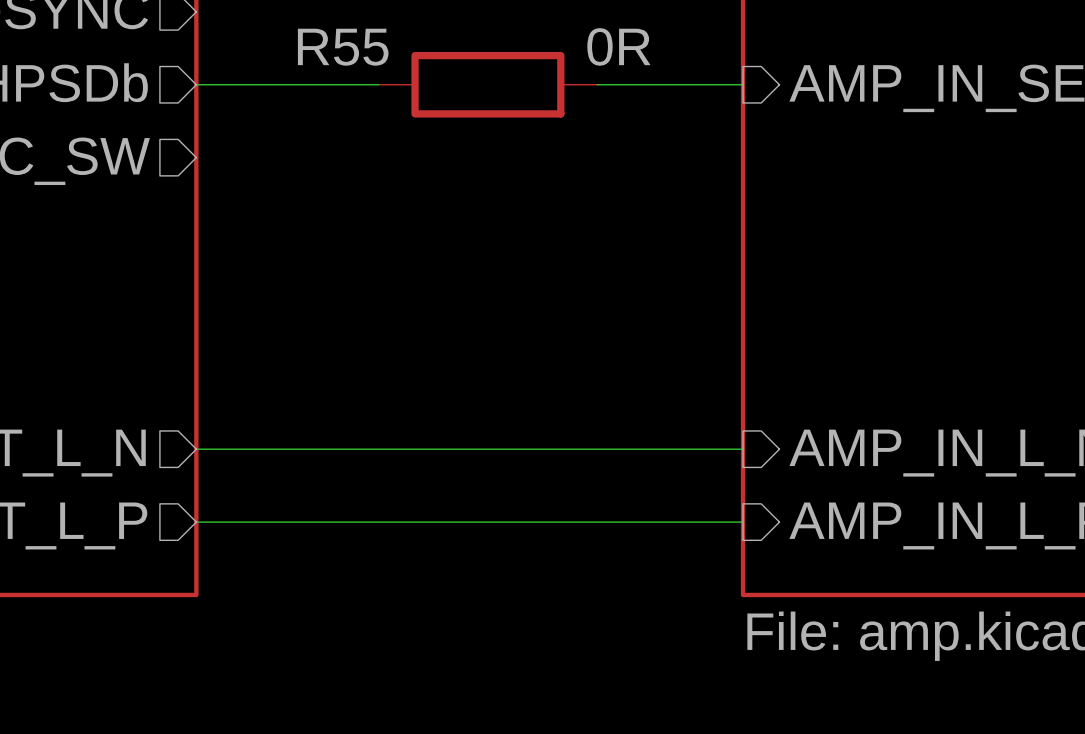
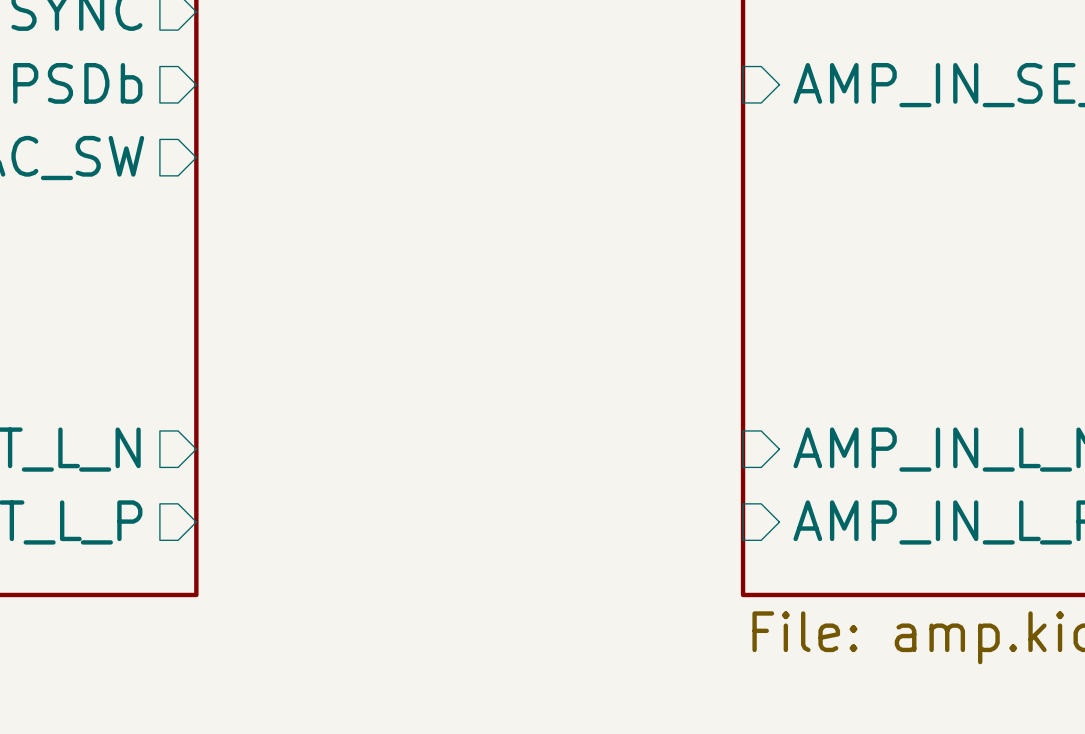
wire: (196, 84) (378, 84) -> none
R55: 0R (487, 84) -> none
wire: (597, 84) (743, 84) -> none
wire: (196, 449) (743, 449) -> none
wire: (196, 522) (743, 522) -> none

